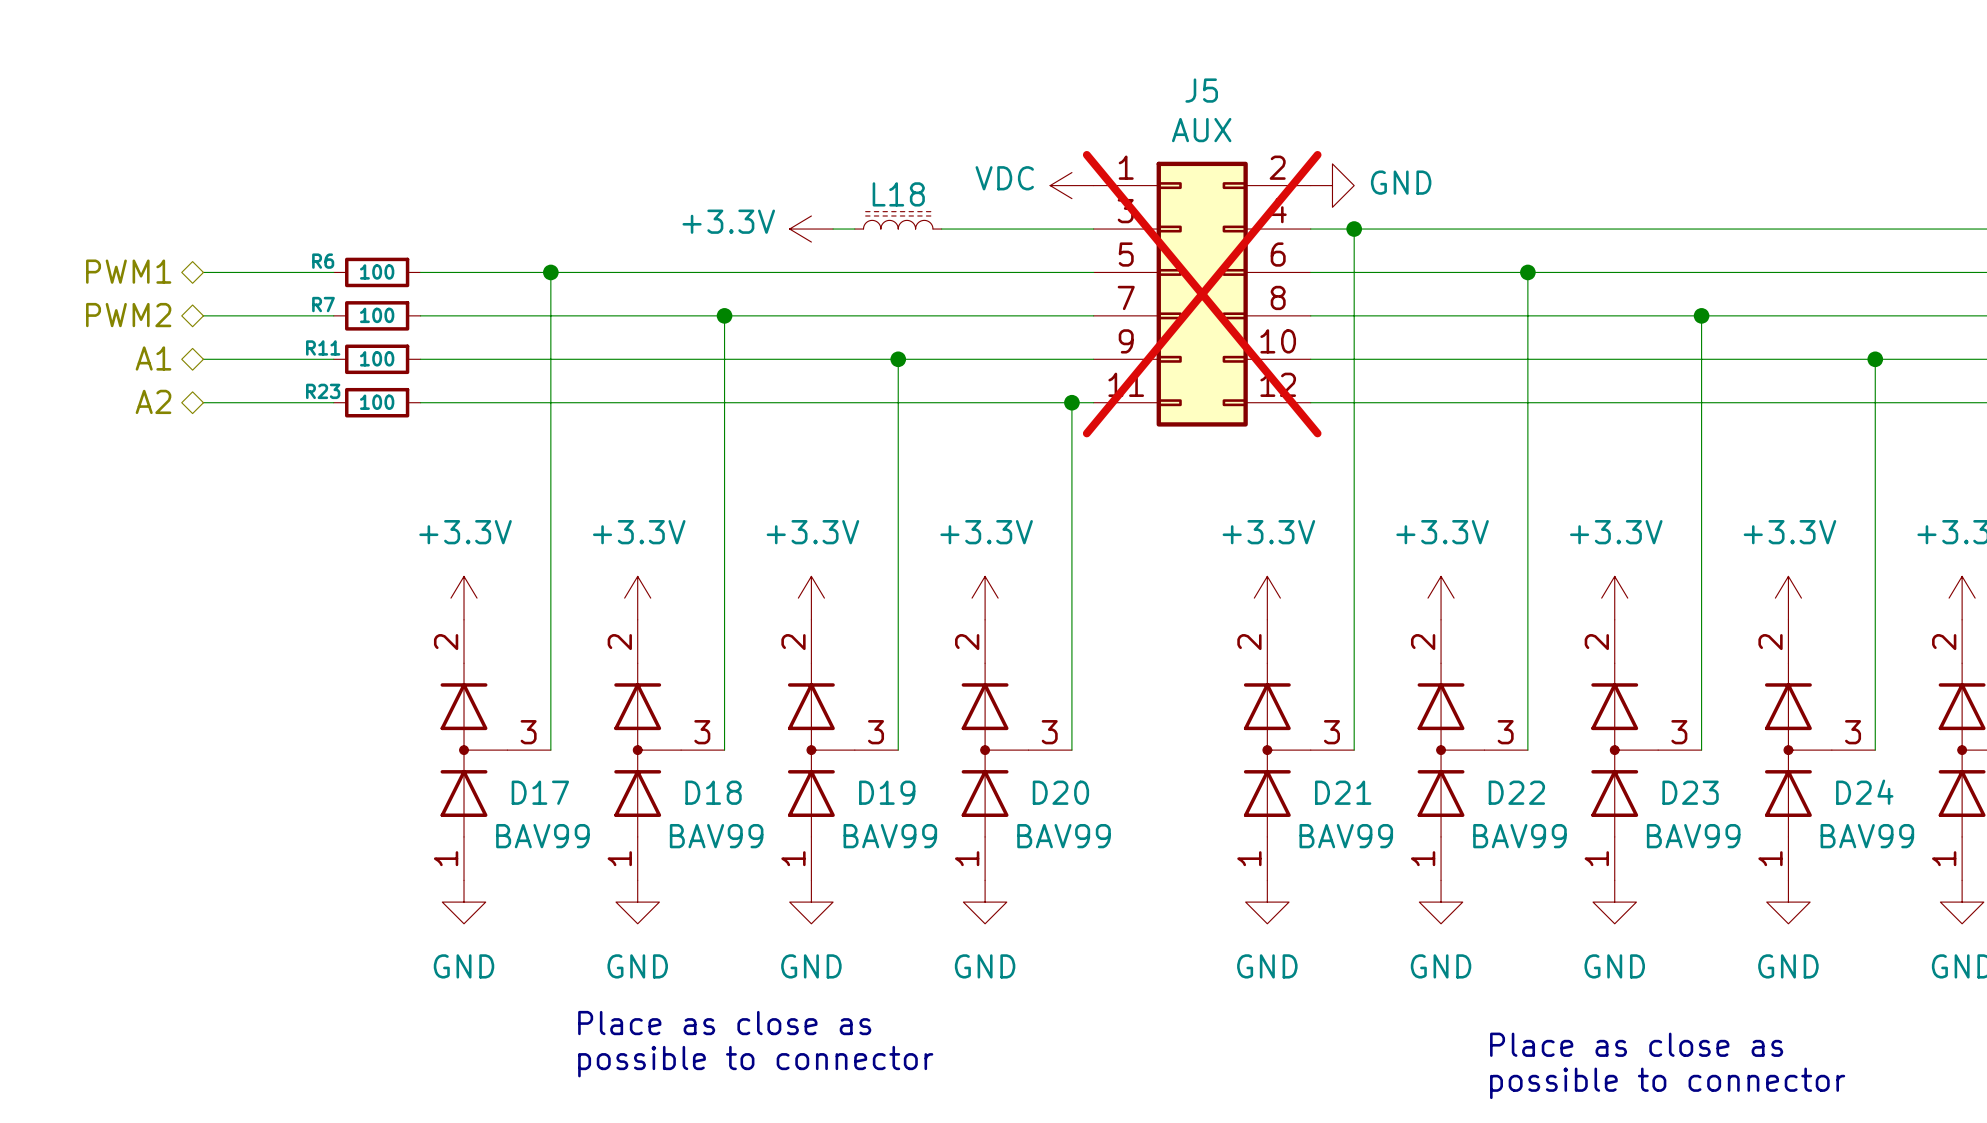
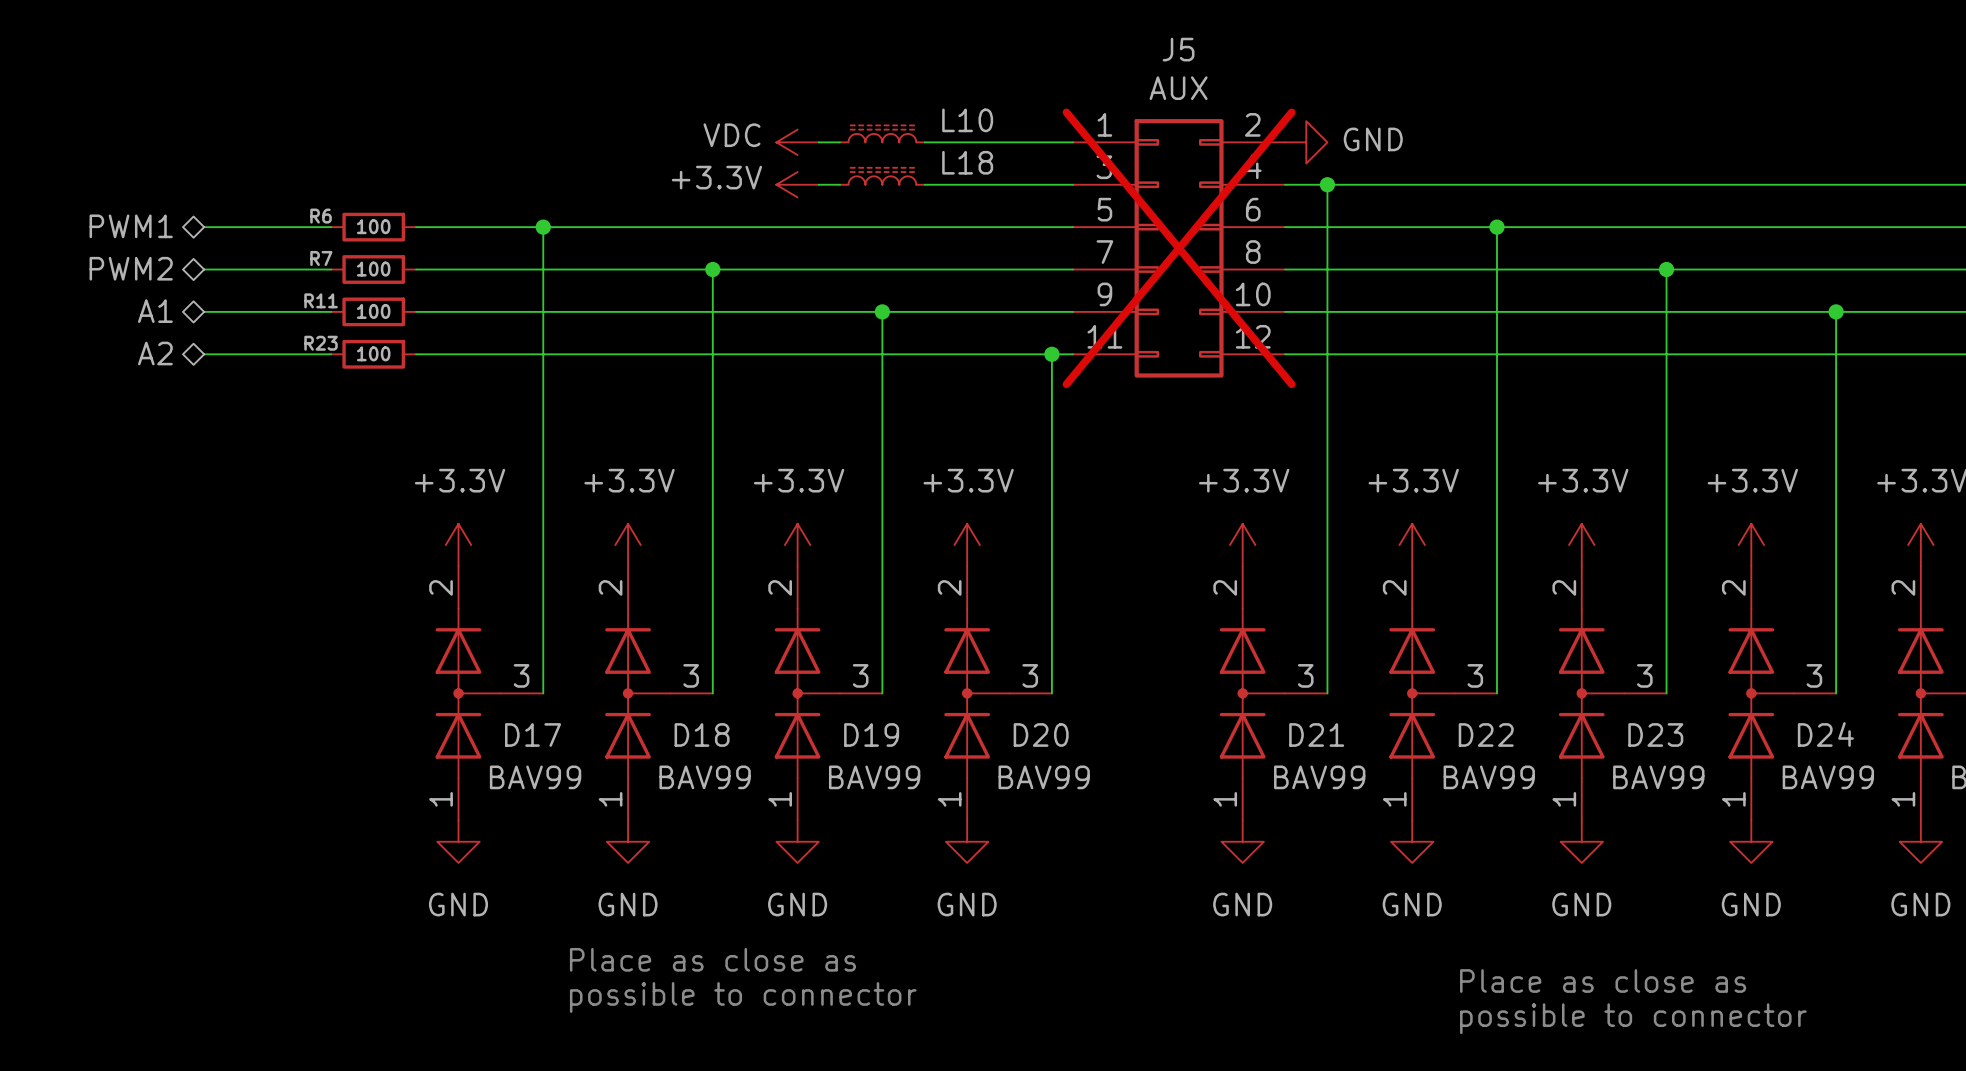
L10: none -> (882, 133)
wire: none -> (818, 142) (839, 142)
wire: none -> (924, 142) (1073, 142)
power symbol position: VDC (1071, 185) -> VDC (797, 142)
L18 name position: L18 (898, 194) -> L18 (967, 162)

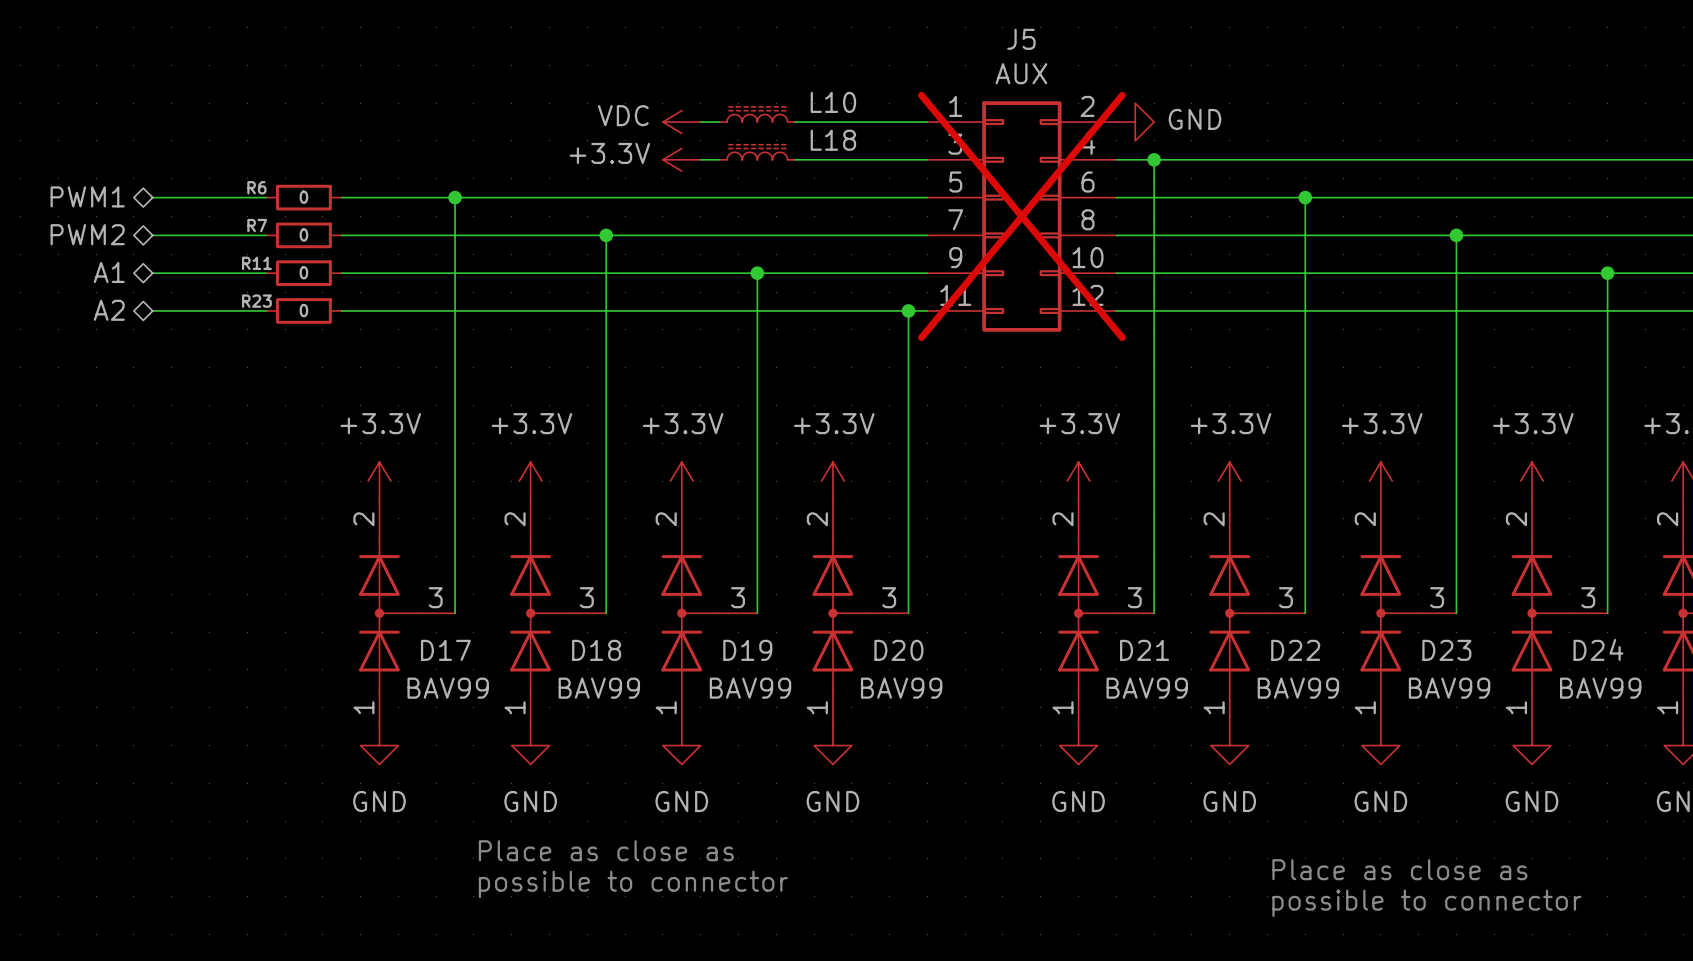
R6 value: 100 (373, 226) -> 0 (303, 197)
R7 value: 100 (373, 269) -> 0 (303, 234)
R11 value: 100 (373, 311) -> 0 (303, 272)
R23 value: 100 (373, 353) -> 0 (303, 310)

